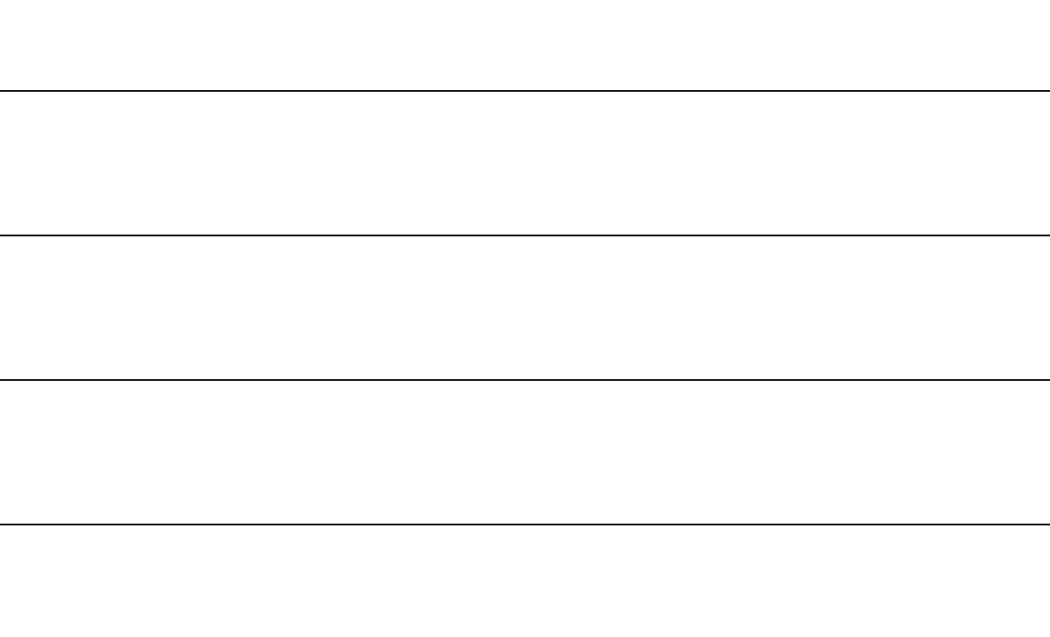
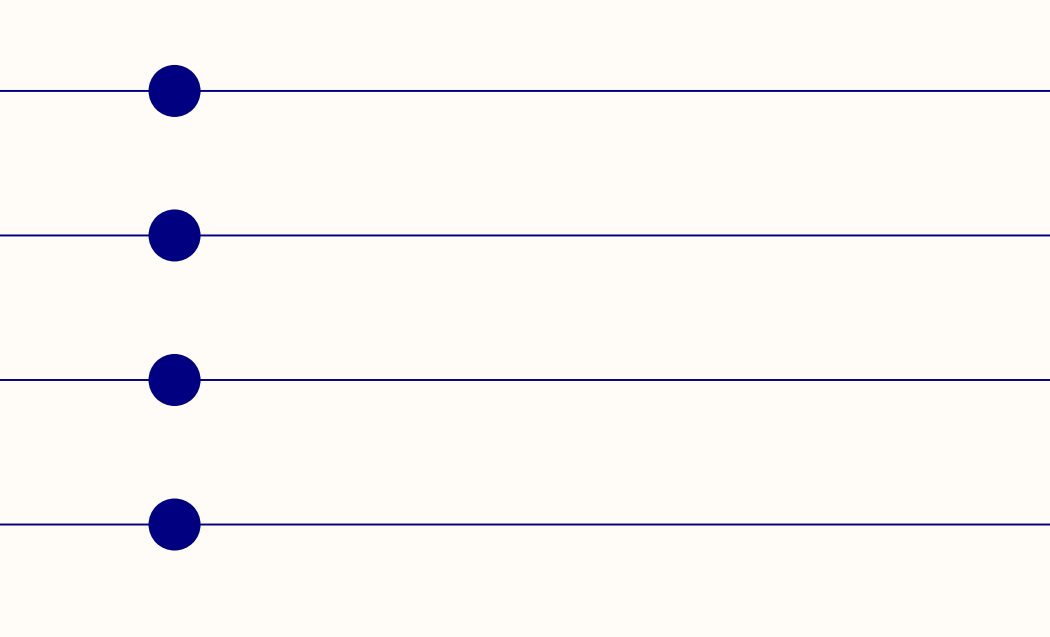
junction: none -> (174, 90)
junction: none -> (174, 235)
junction: none -> (174, 379)
junction: none -> (174, 524)

